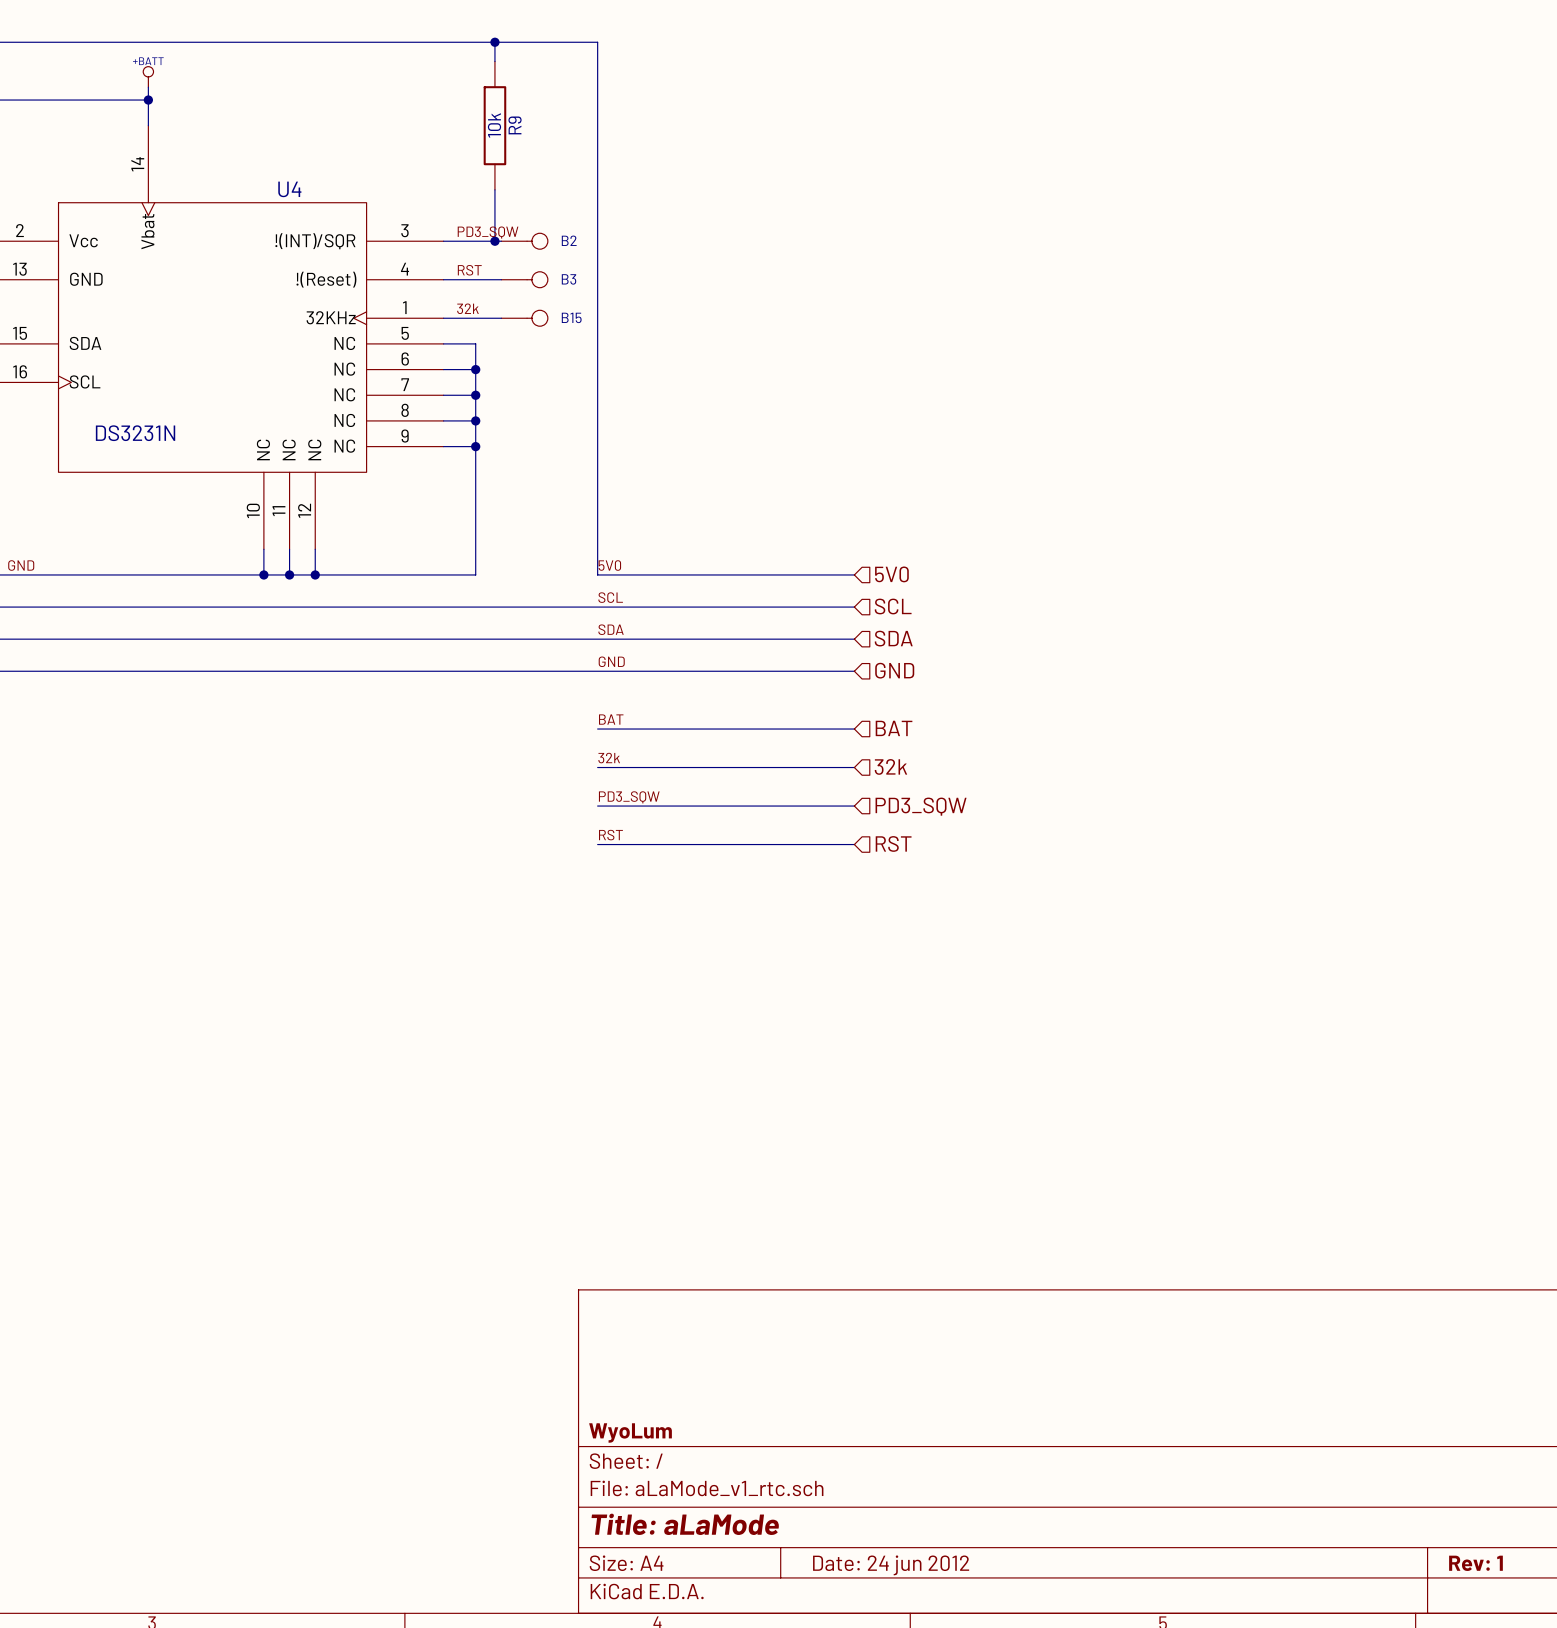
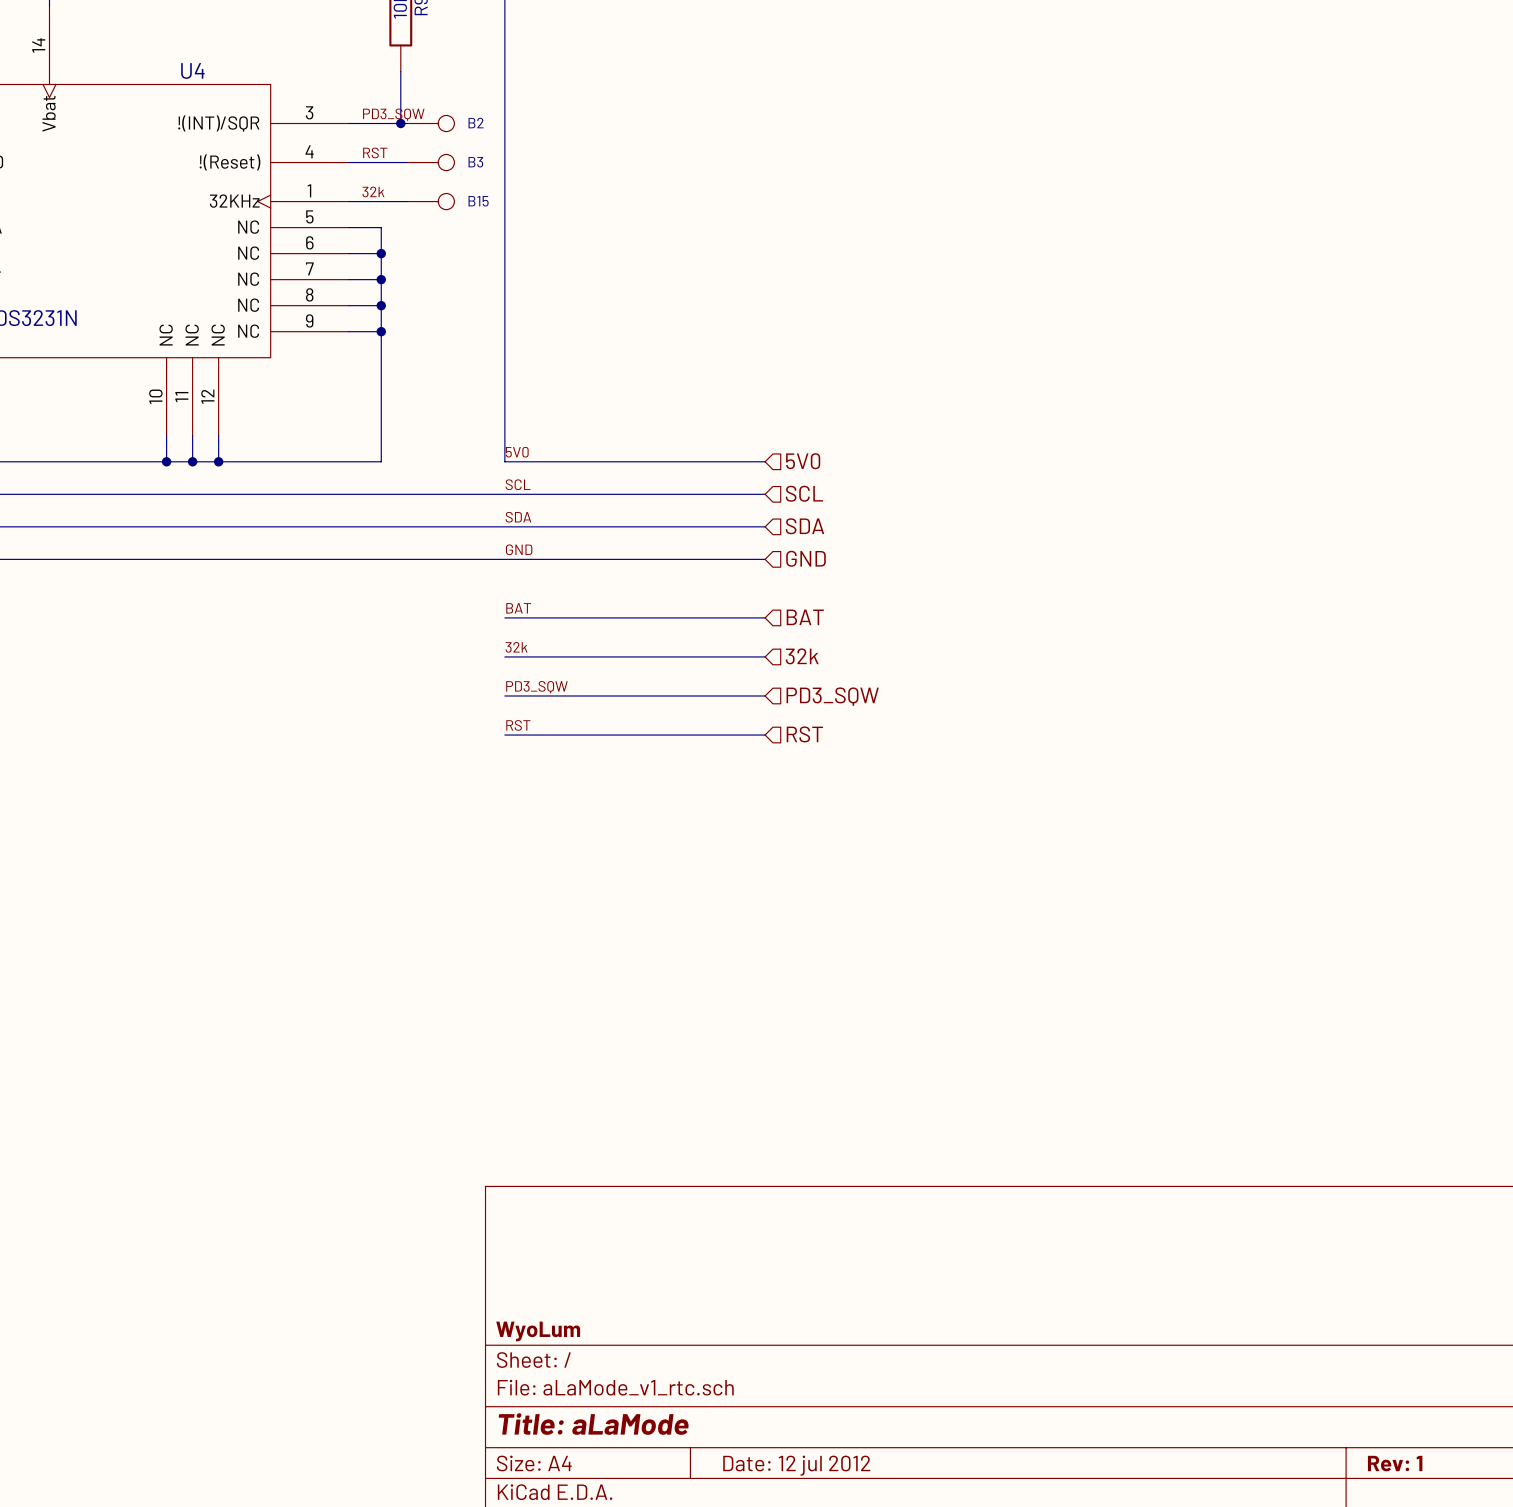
title block: Date: 24 jun 2012 (891, 1565) -> Date: 12 jul 2012 (796, 1465)

